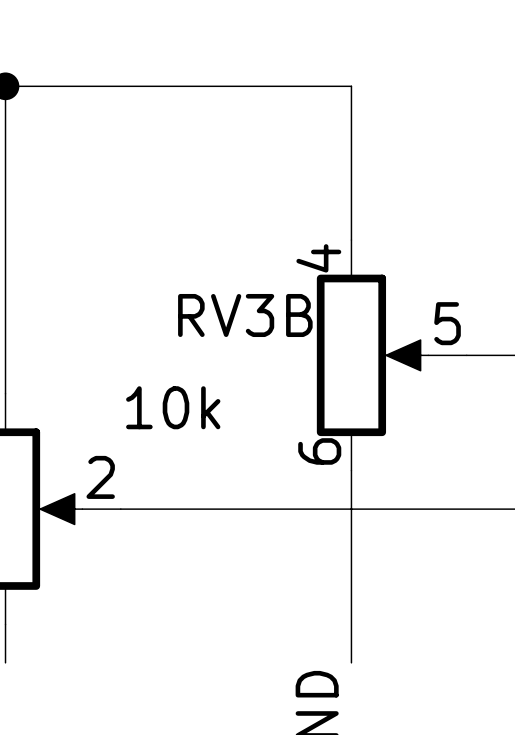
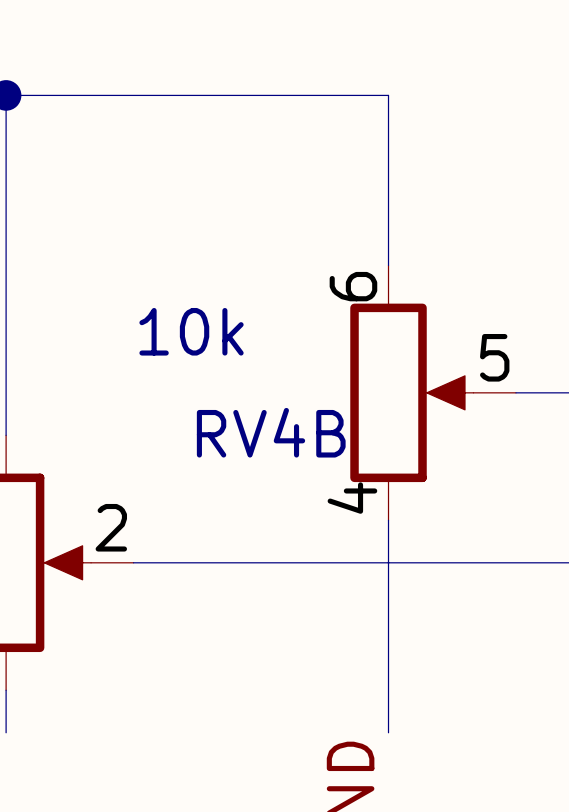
RV3B name: RV3B (245, 315) -> RV4B (271, 432)
RV3B flip: as is (372, 355) -> up-down (411, 392)

